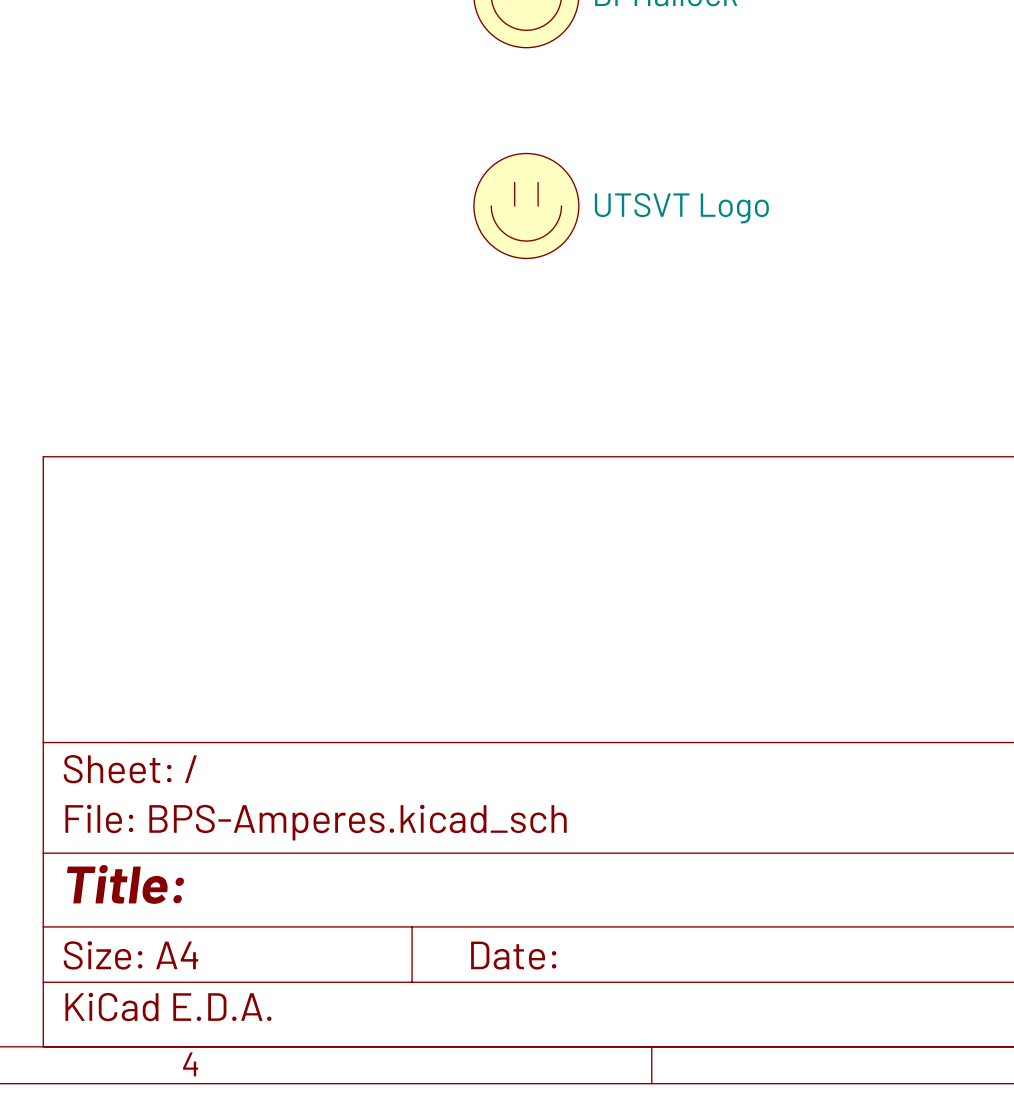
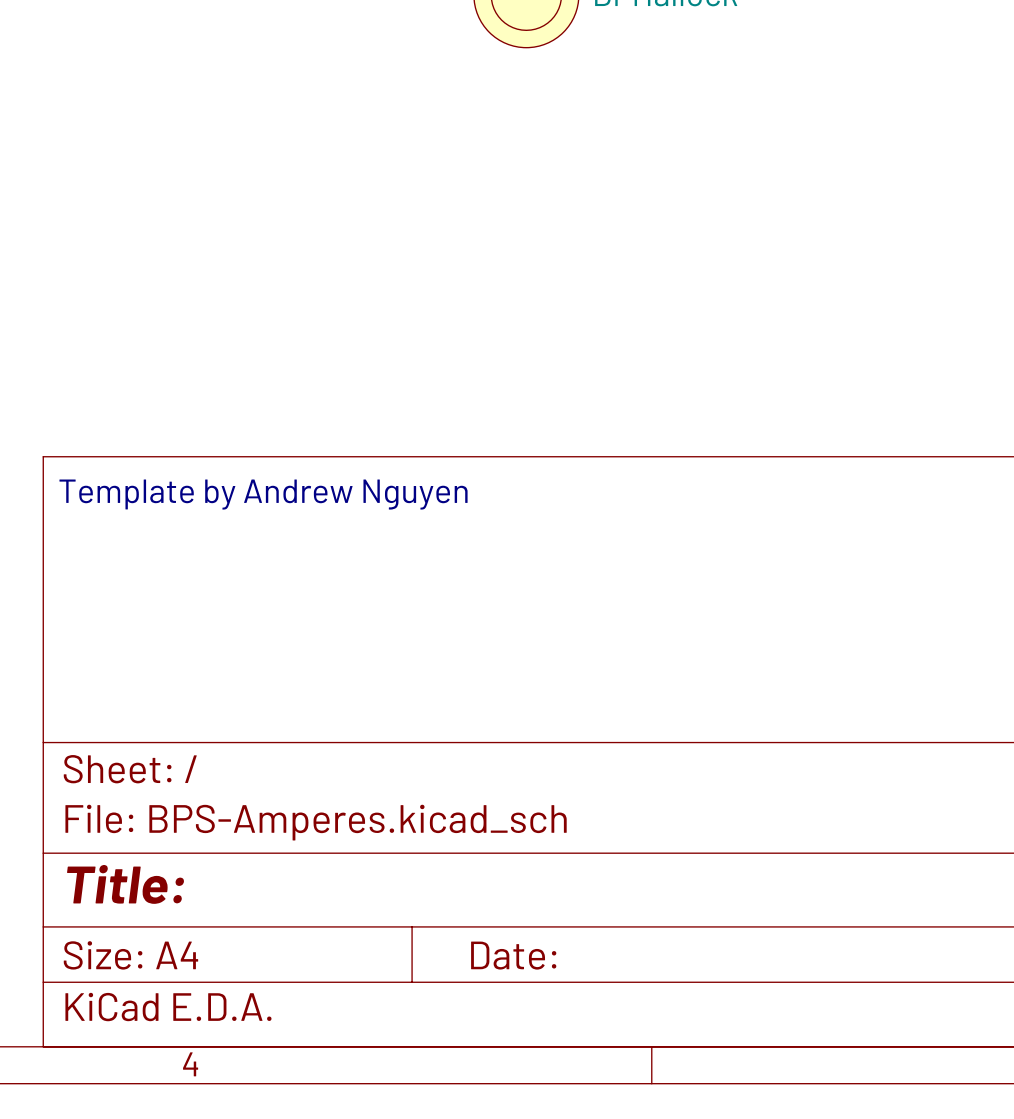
part: UTSVT Logo (526, 205) -> none
text: none -> Template by Andrew Nguyen (263, 494)

